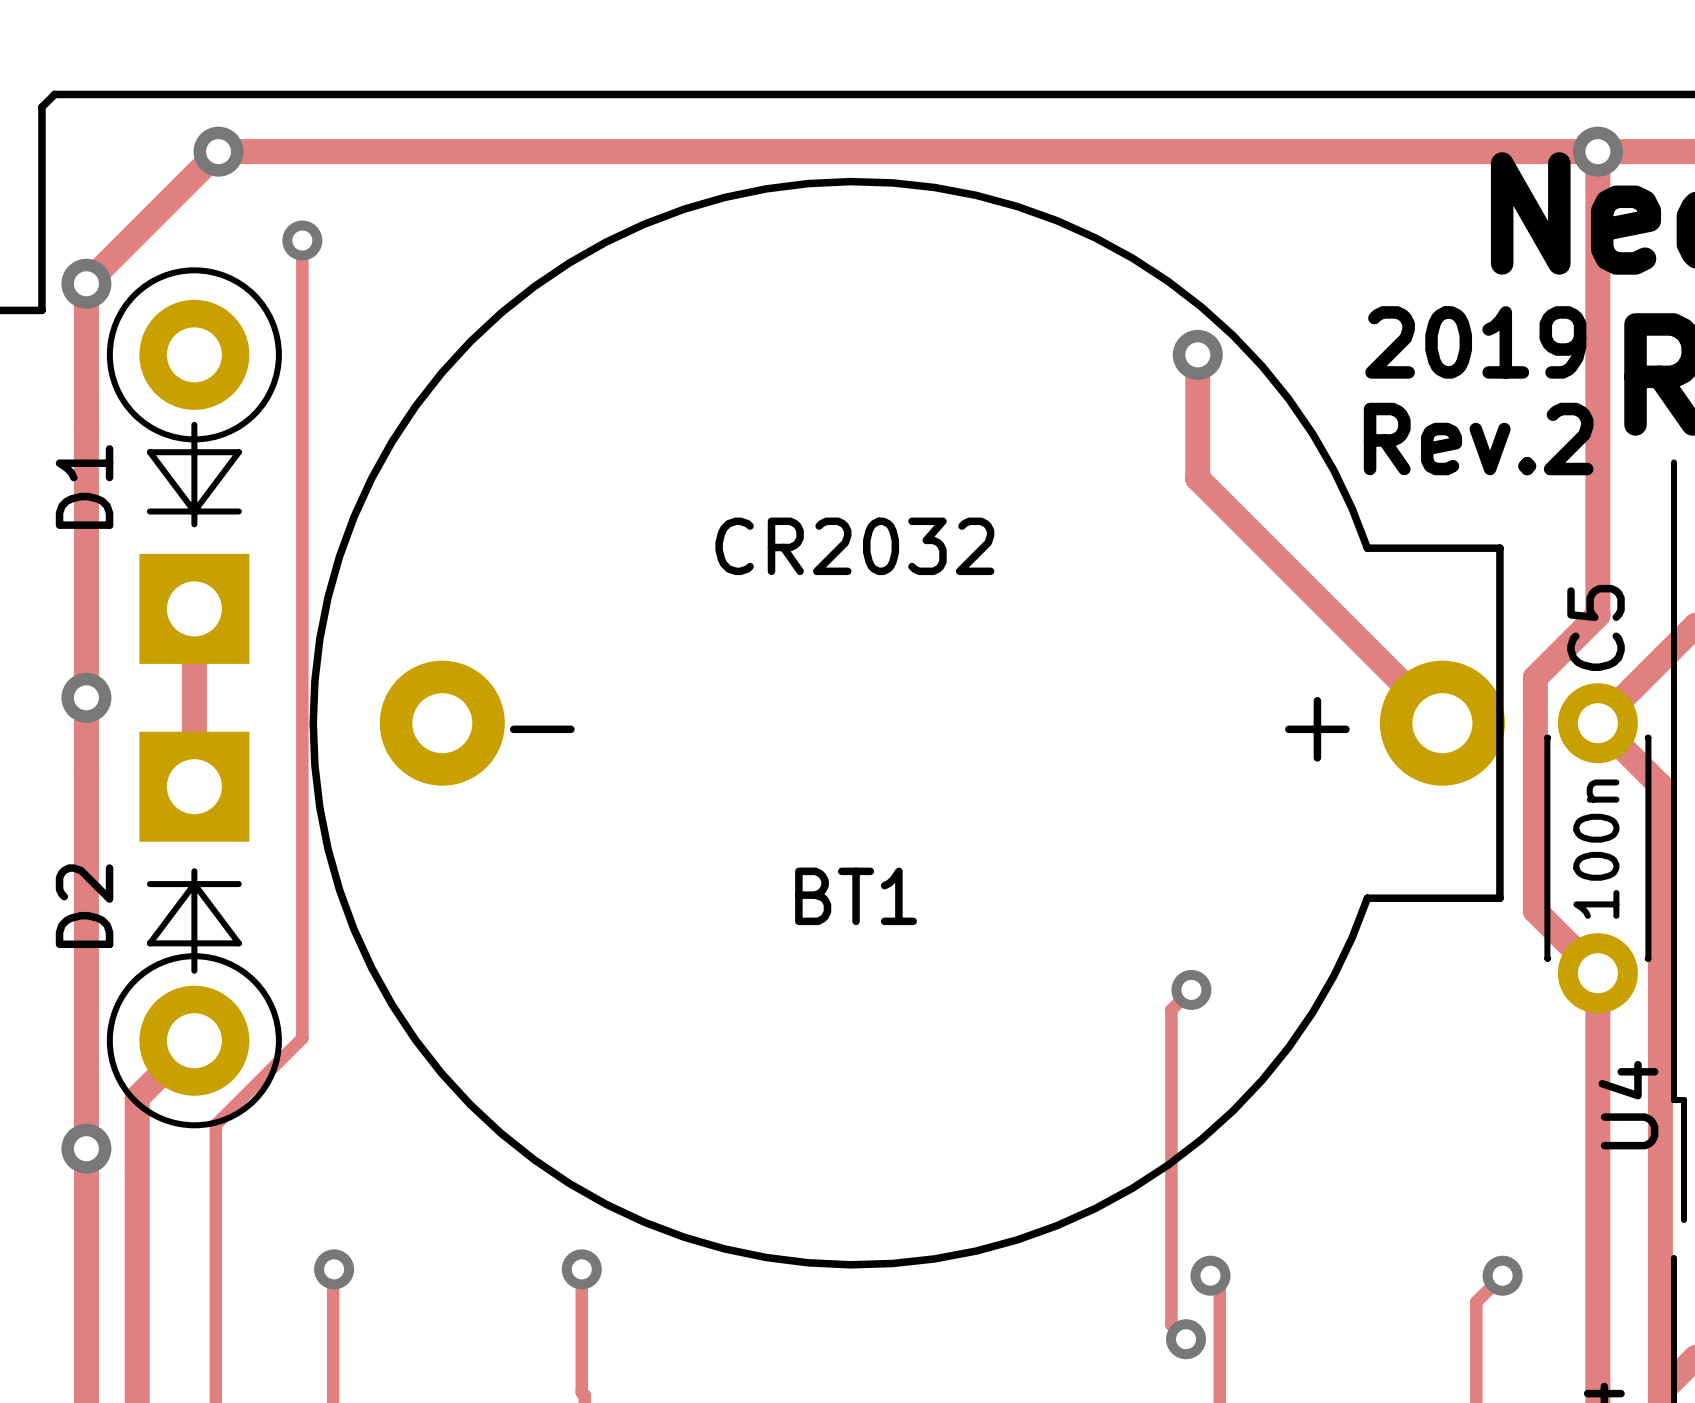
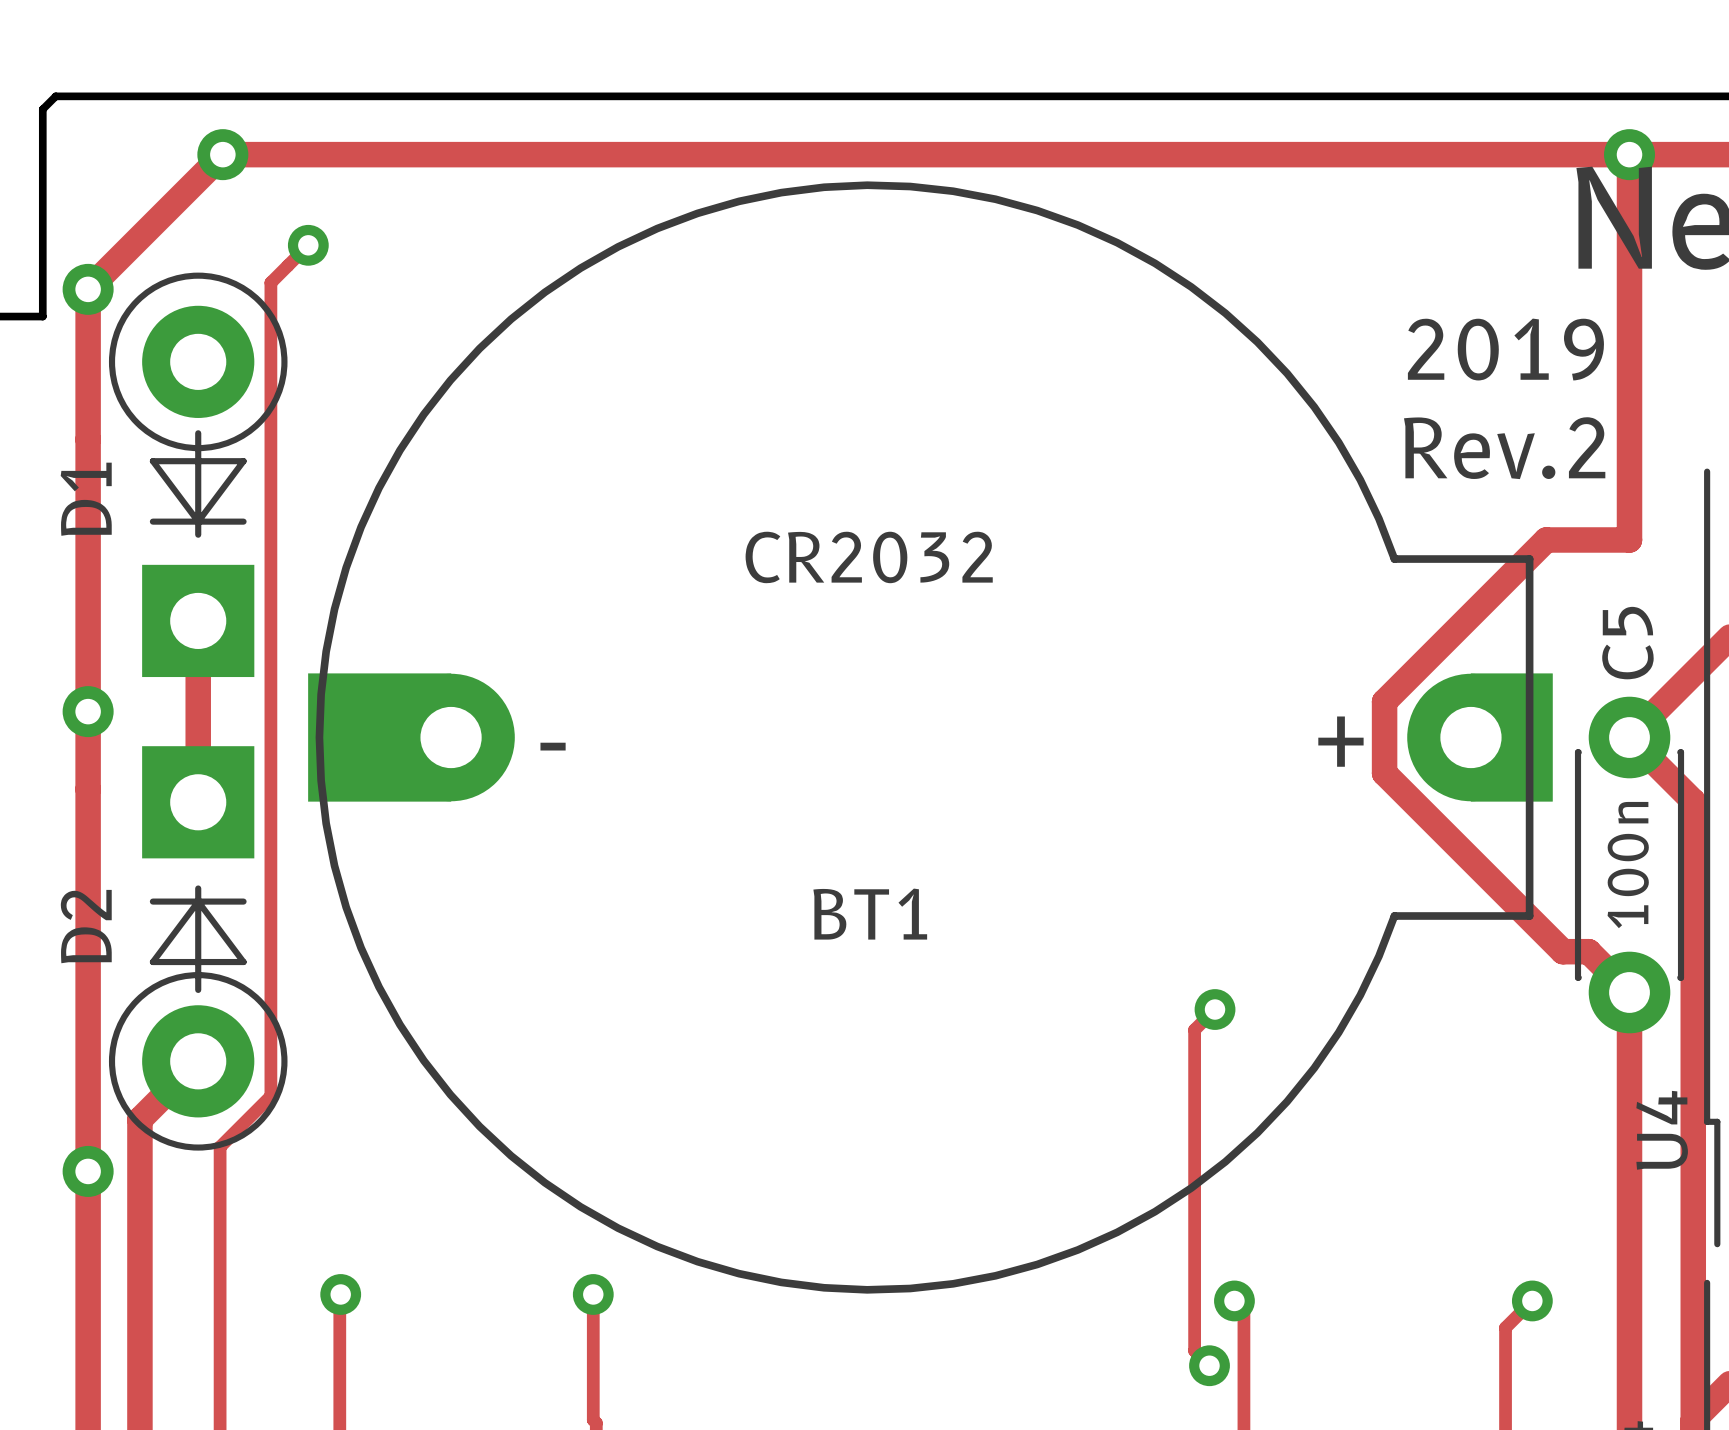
BT1 footprint: [309, 177, 1505, 1269] -> [308, 181, 1553, 1294]
track: (302, 240) (302, 1038) (265, 1074) -> (308, 245) (270, 282) (270, 1096)
track: (1197, 354) (1197, 478) (1442, 723) -> none
via: (1197, 354) -> none
track: (1597, 529) (1597, 615) (1535, 677) (1535, 910) (1557, 933) -> (1629, 539) (1546, 539) (1384, 701) (1384, 773) (1562, 951) (1588, 951)

